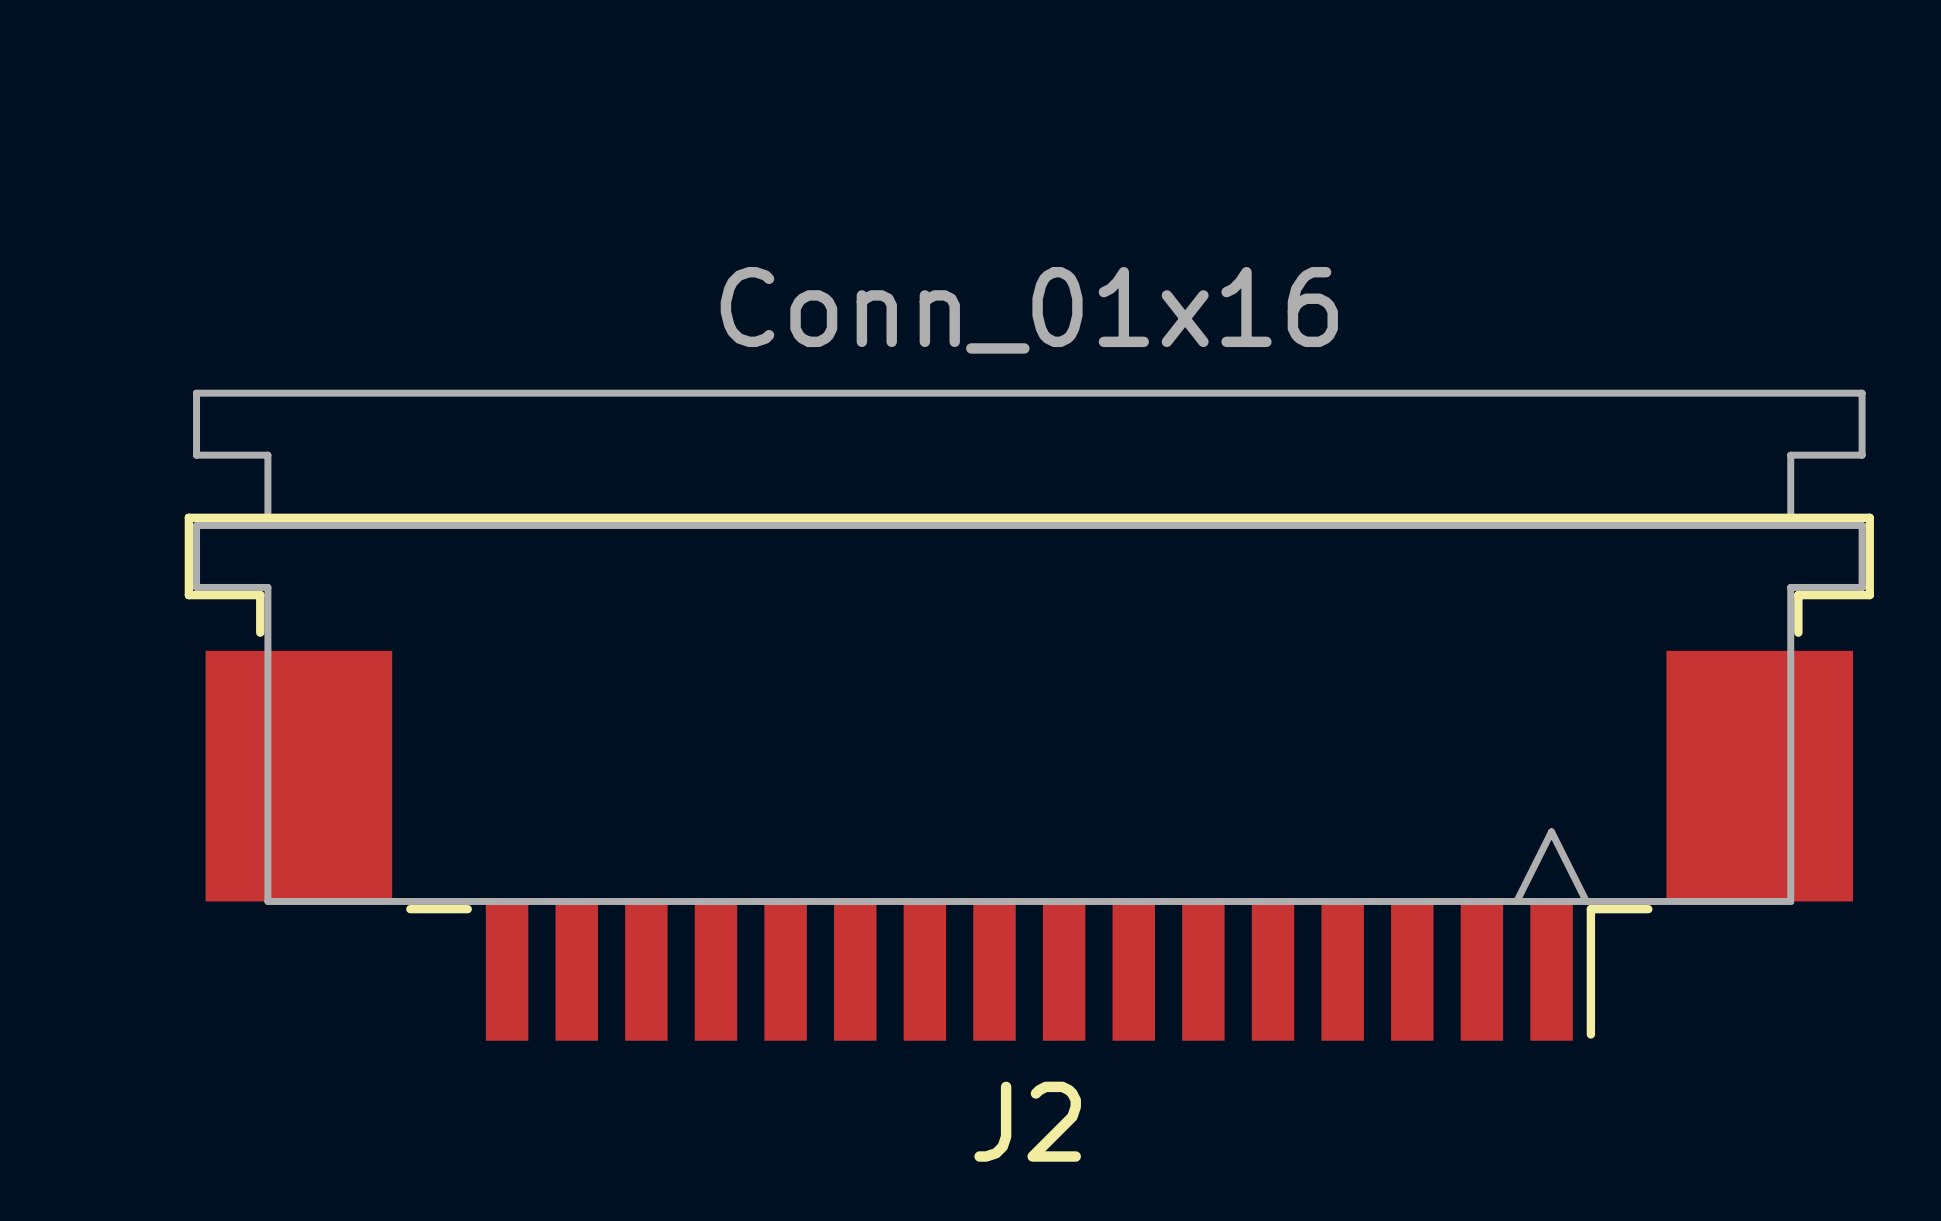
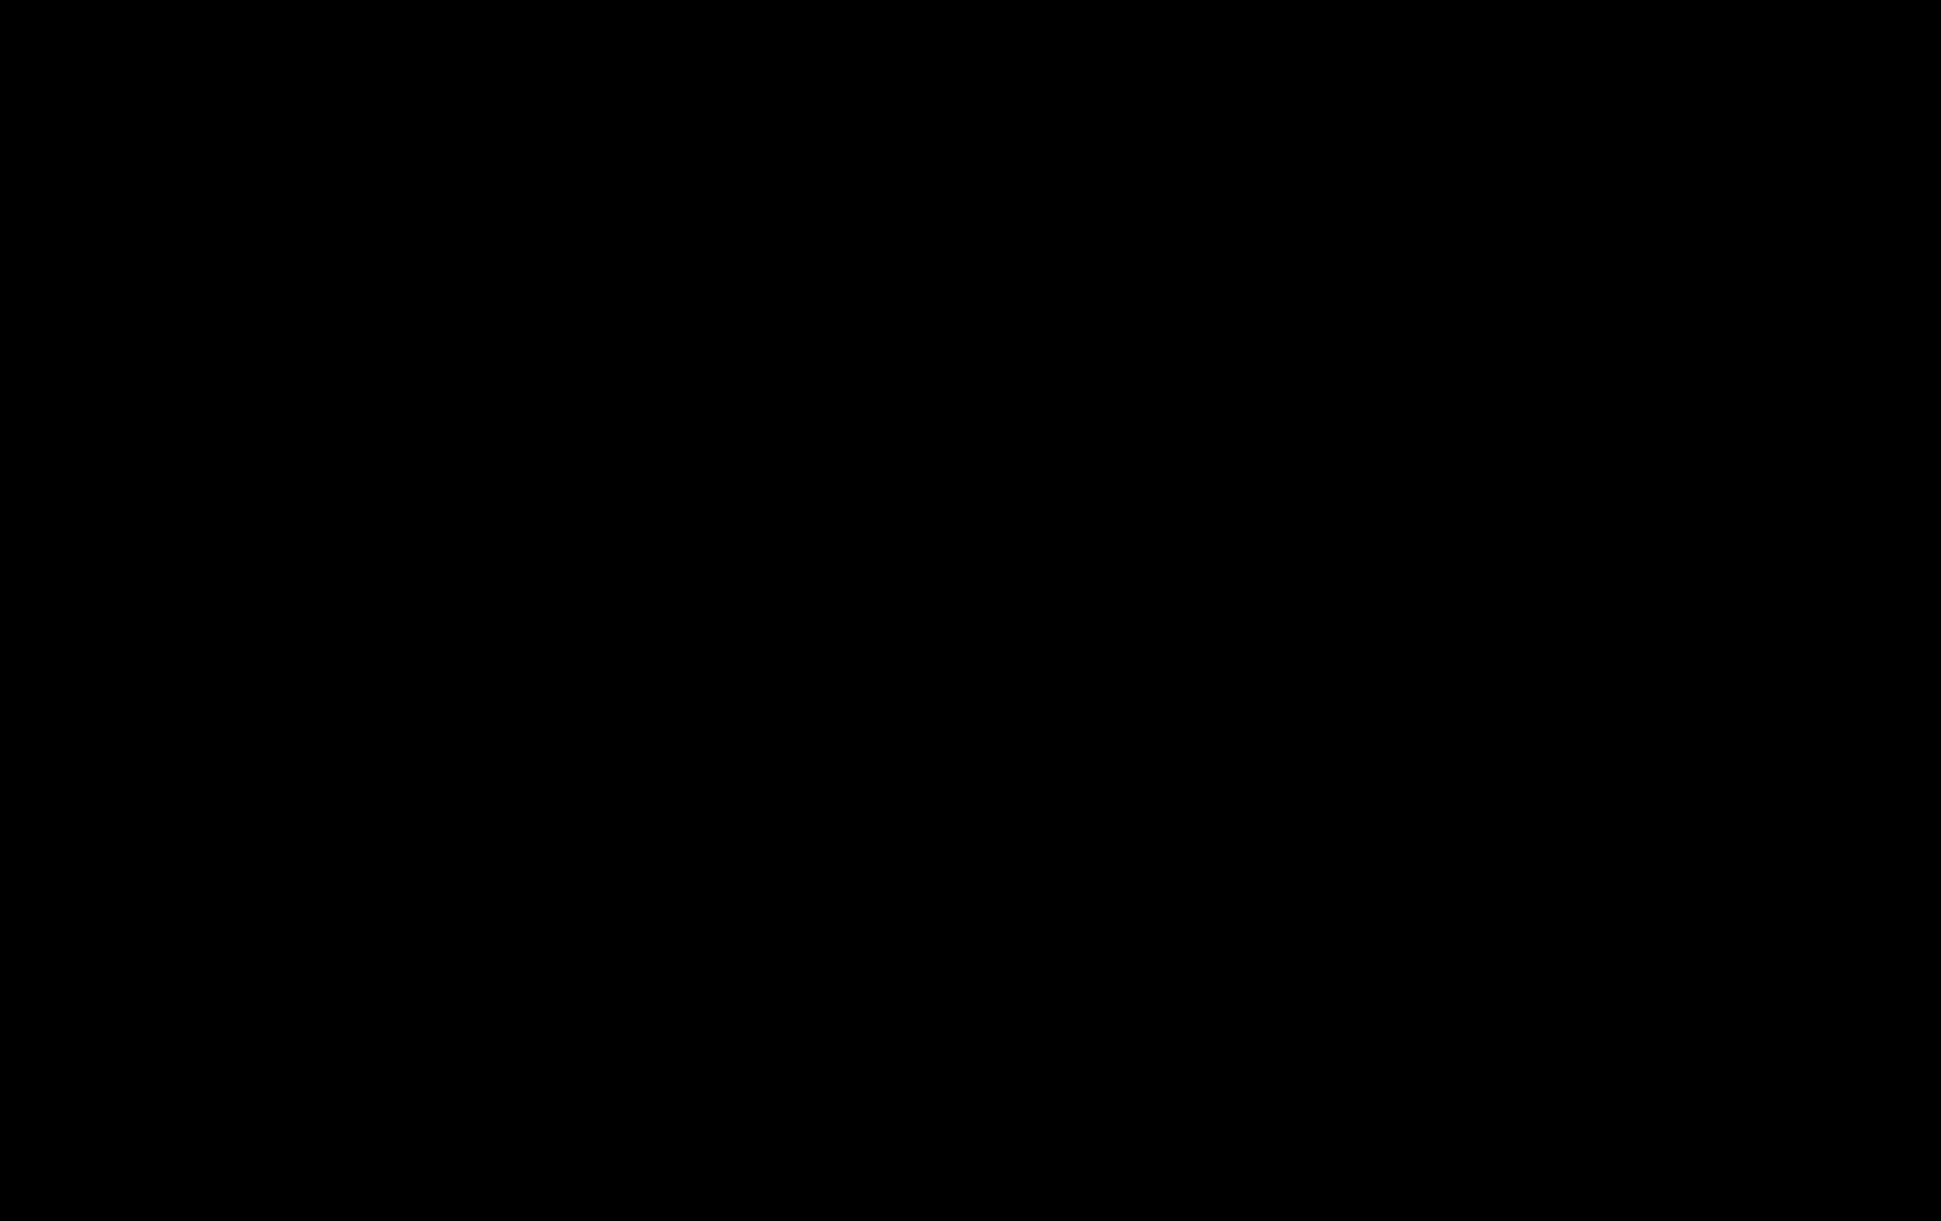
J2: Conn_01x16 (1029, 715) -> none

